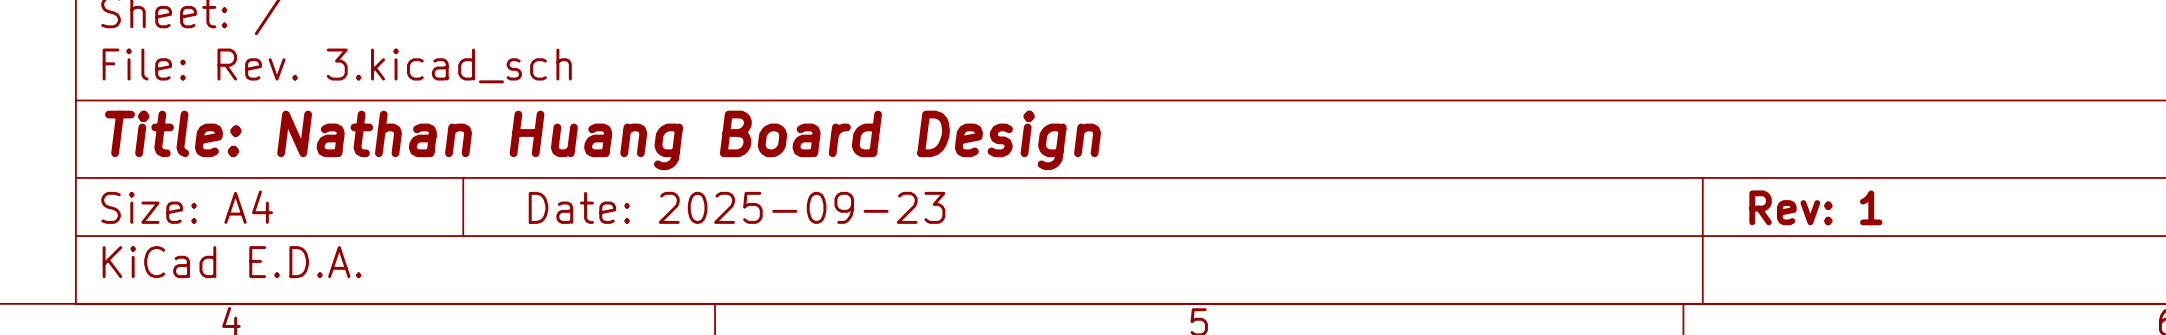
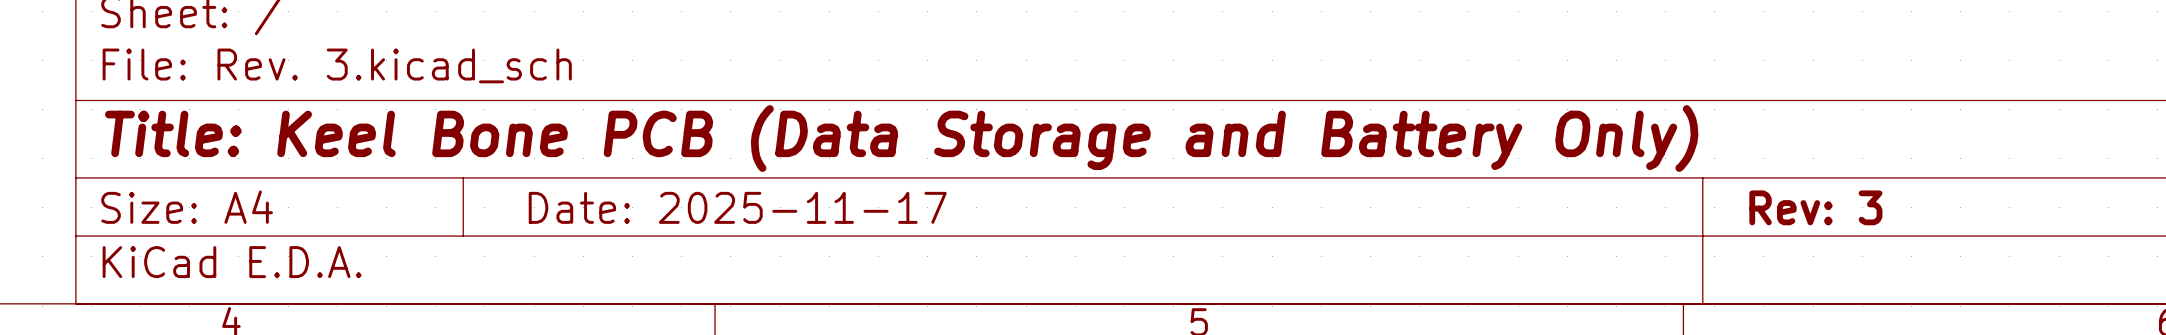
title block: Title: Nathan Huang Board Design (603, 140) -> Title: Keel Bone PCB (Data Storage and Battery Only) (901, 138)
title block: Date: 2025-09-23 (737, 207) -> Date: 2025-11-17 (737, 207)
title block: Rev: 1 (1815, 207) -> Rev: 3 (1815, 207)

